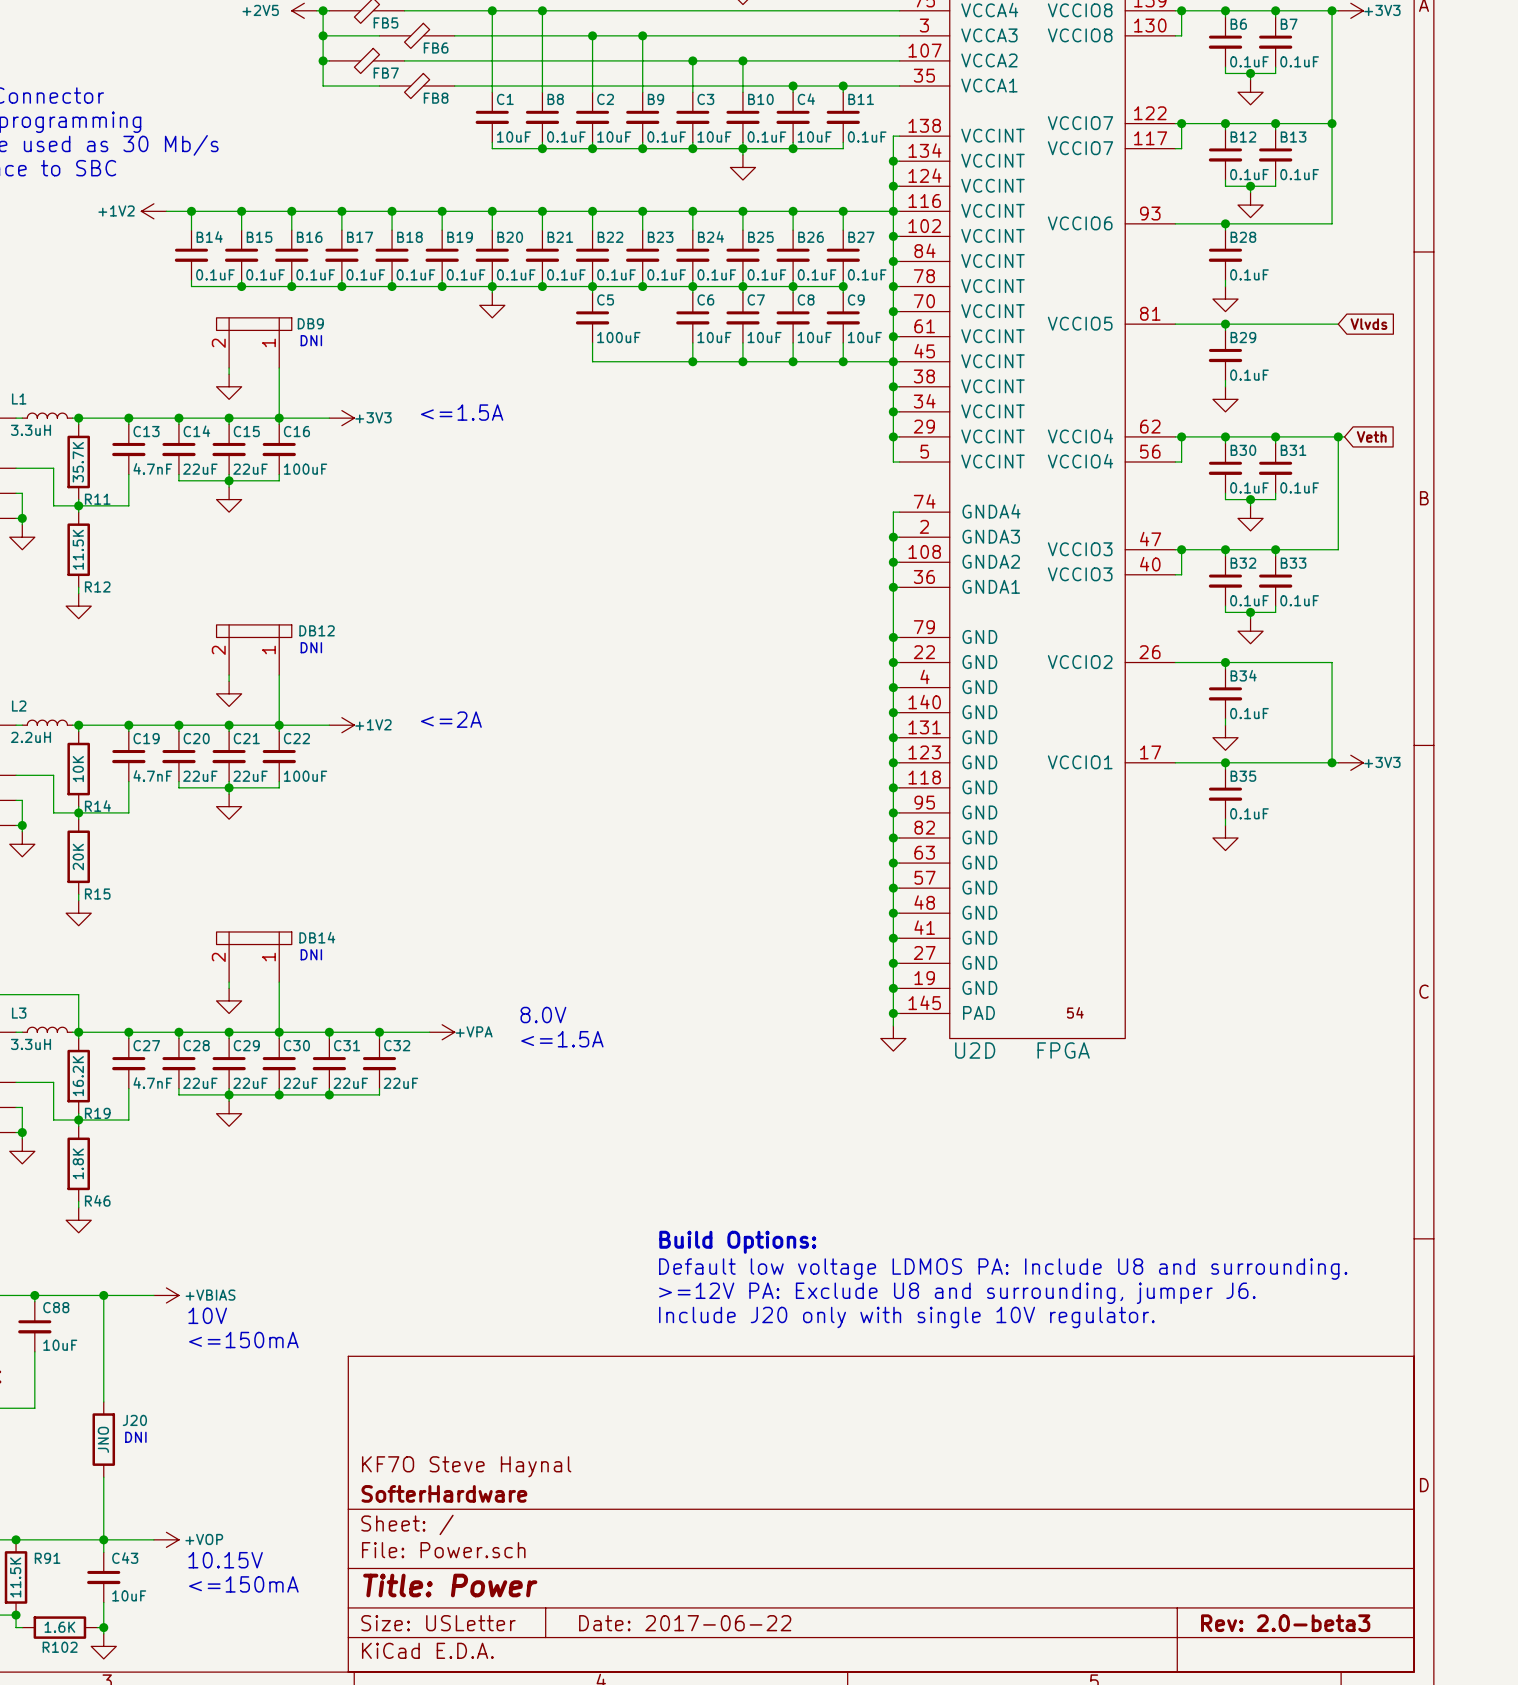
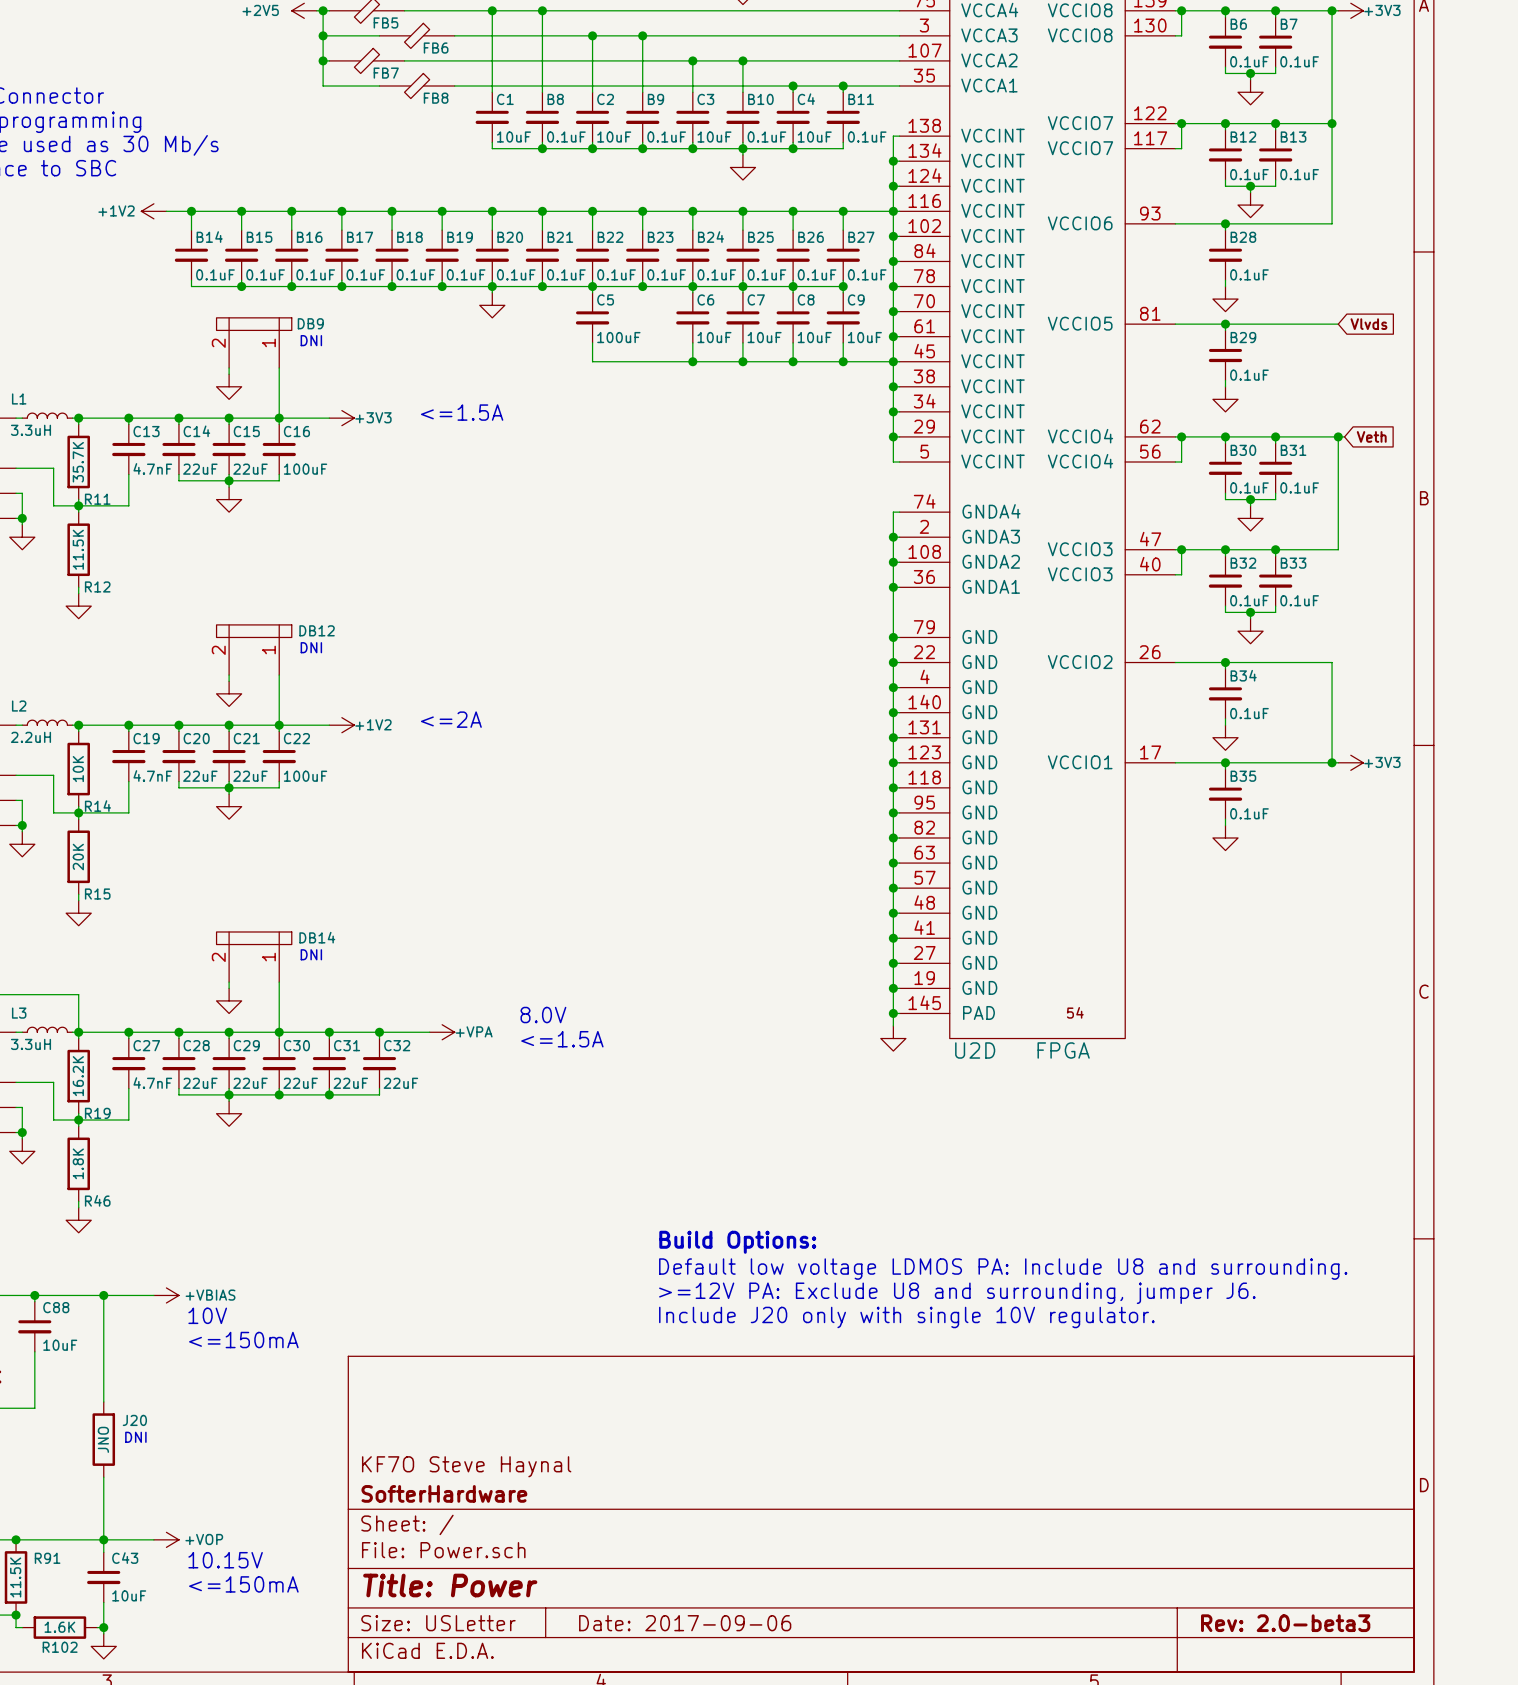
title block: Date: 2017-06-22 (685, 1623) -> Date: 2017-09-06 (685, 1623)

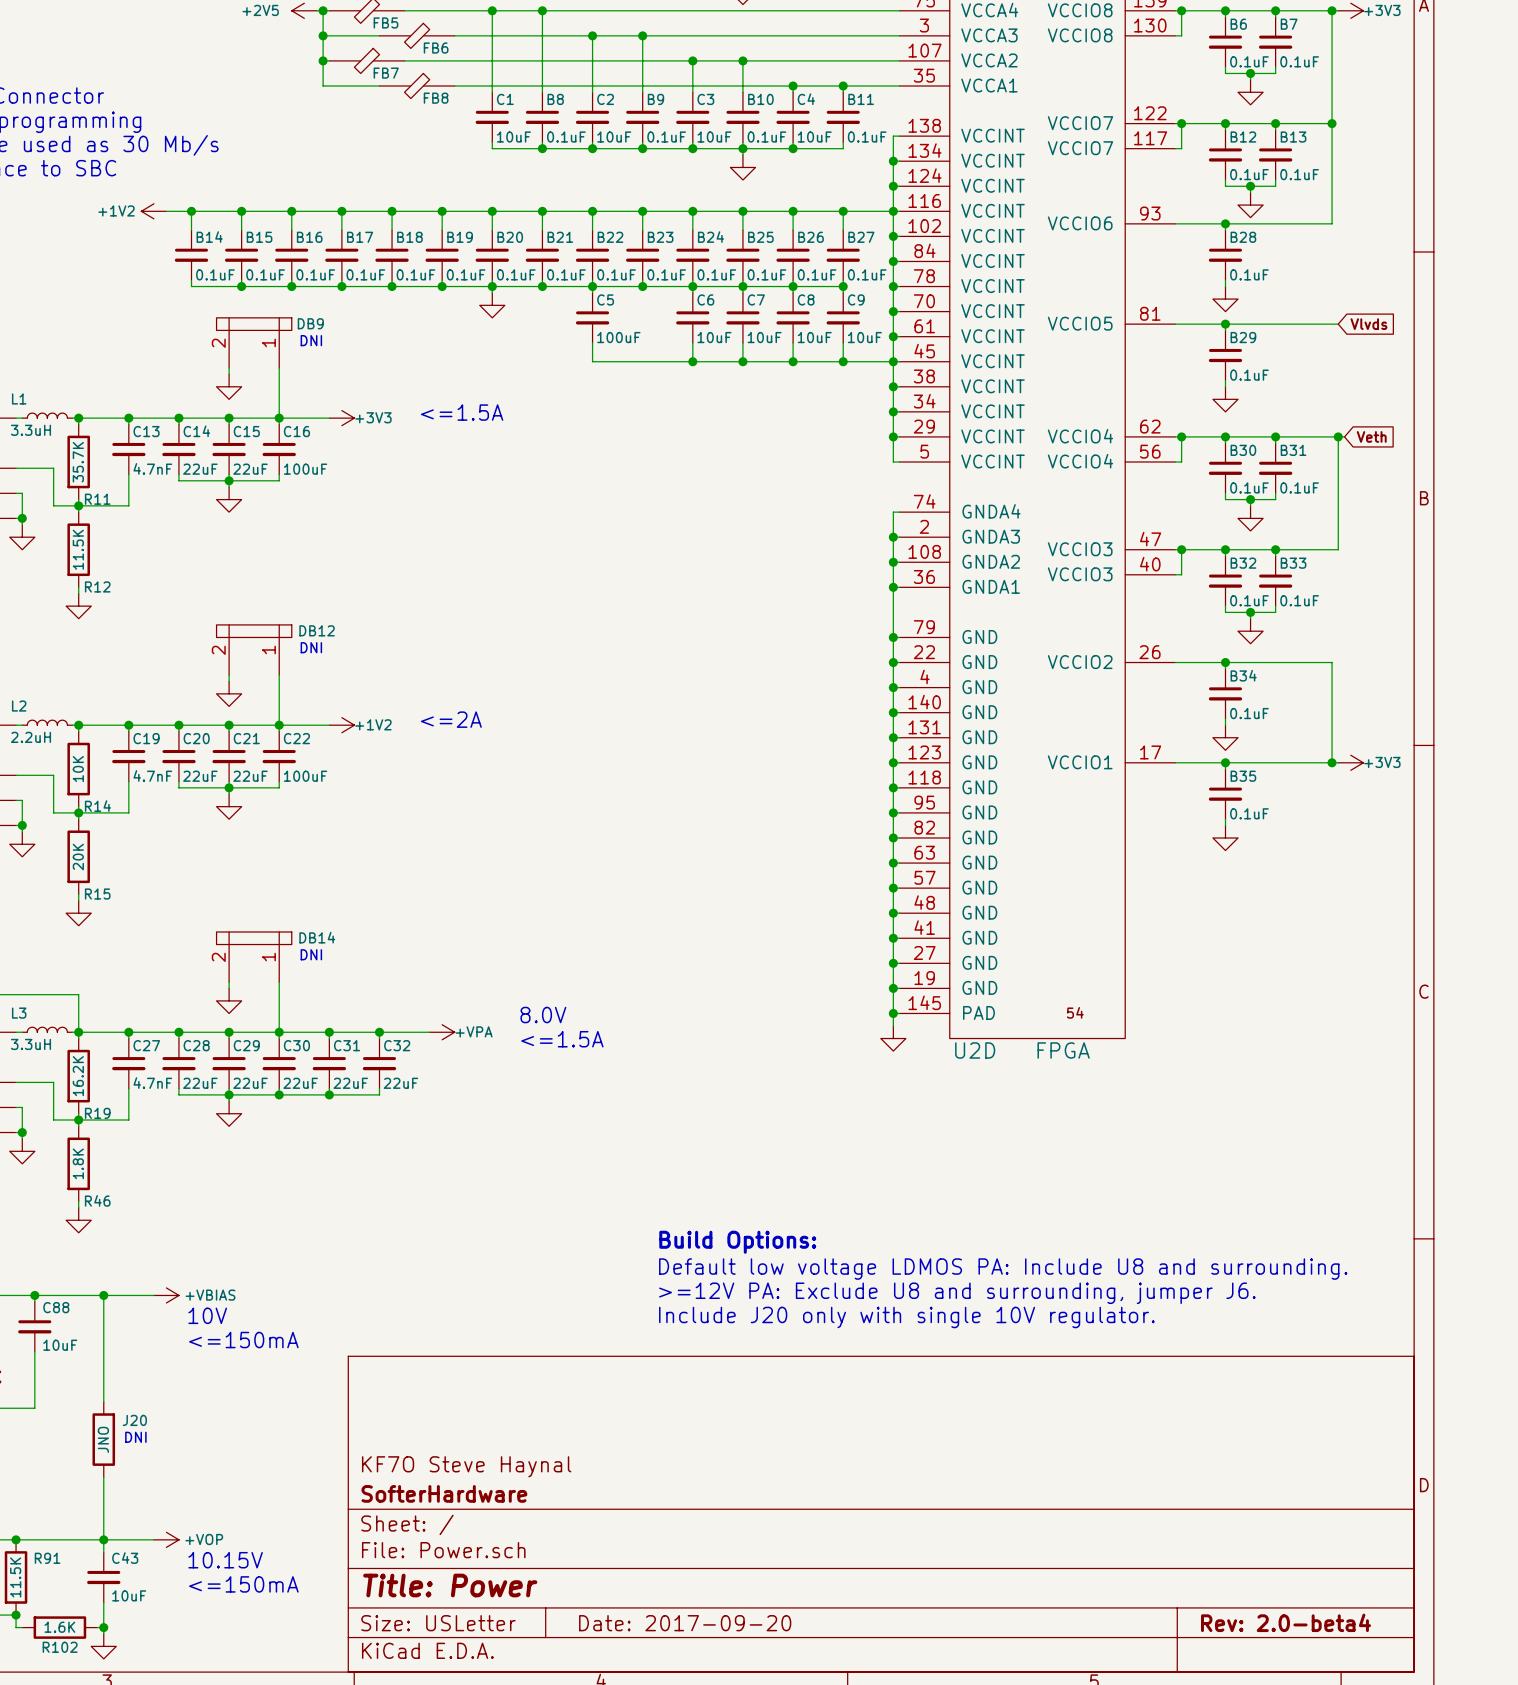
title block: Date: 2017-09-06 (685, 1623) -> Date: 2017-09-20 (685, 1623)
title block: Rev: 2.0-beta3 (1285, 1623) -> Rev: 2.0-beta4 (1286, 1622)

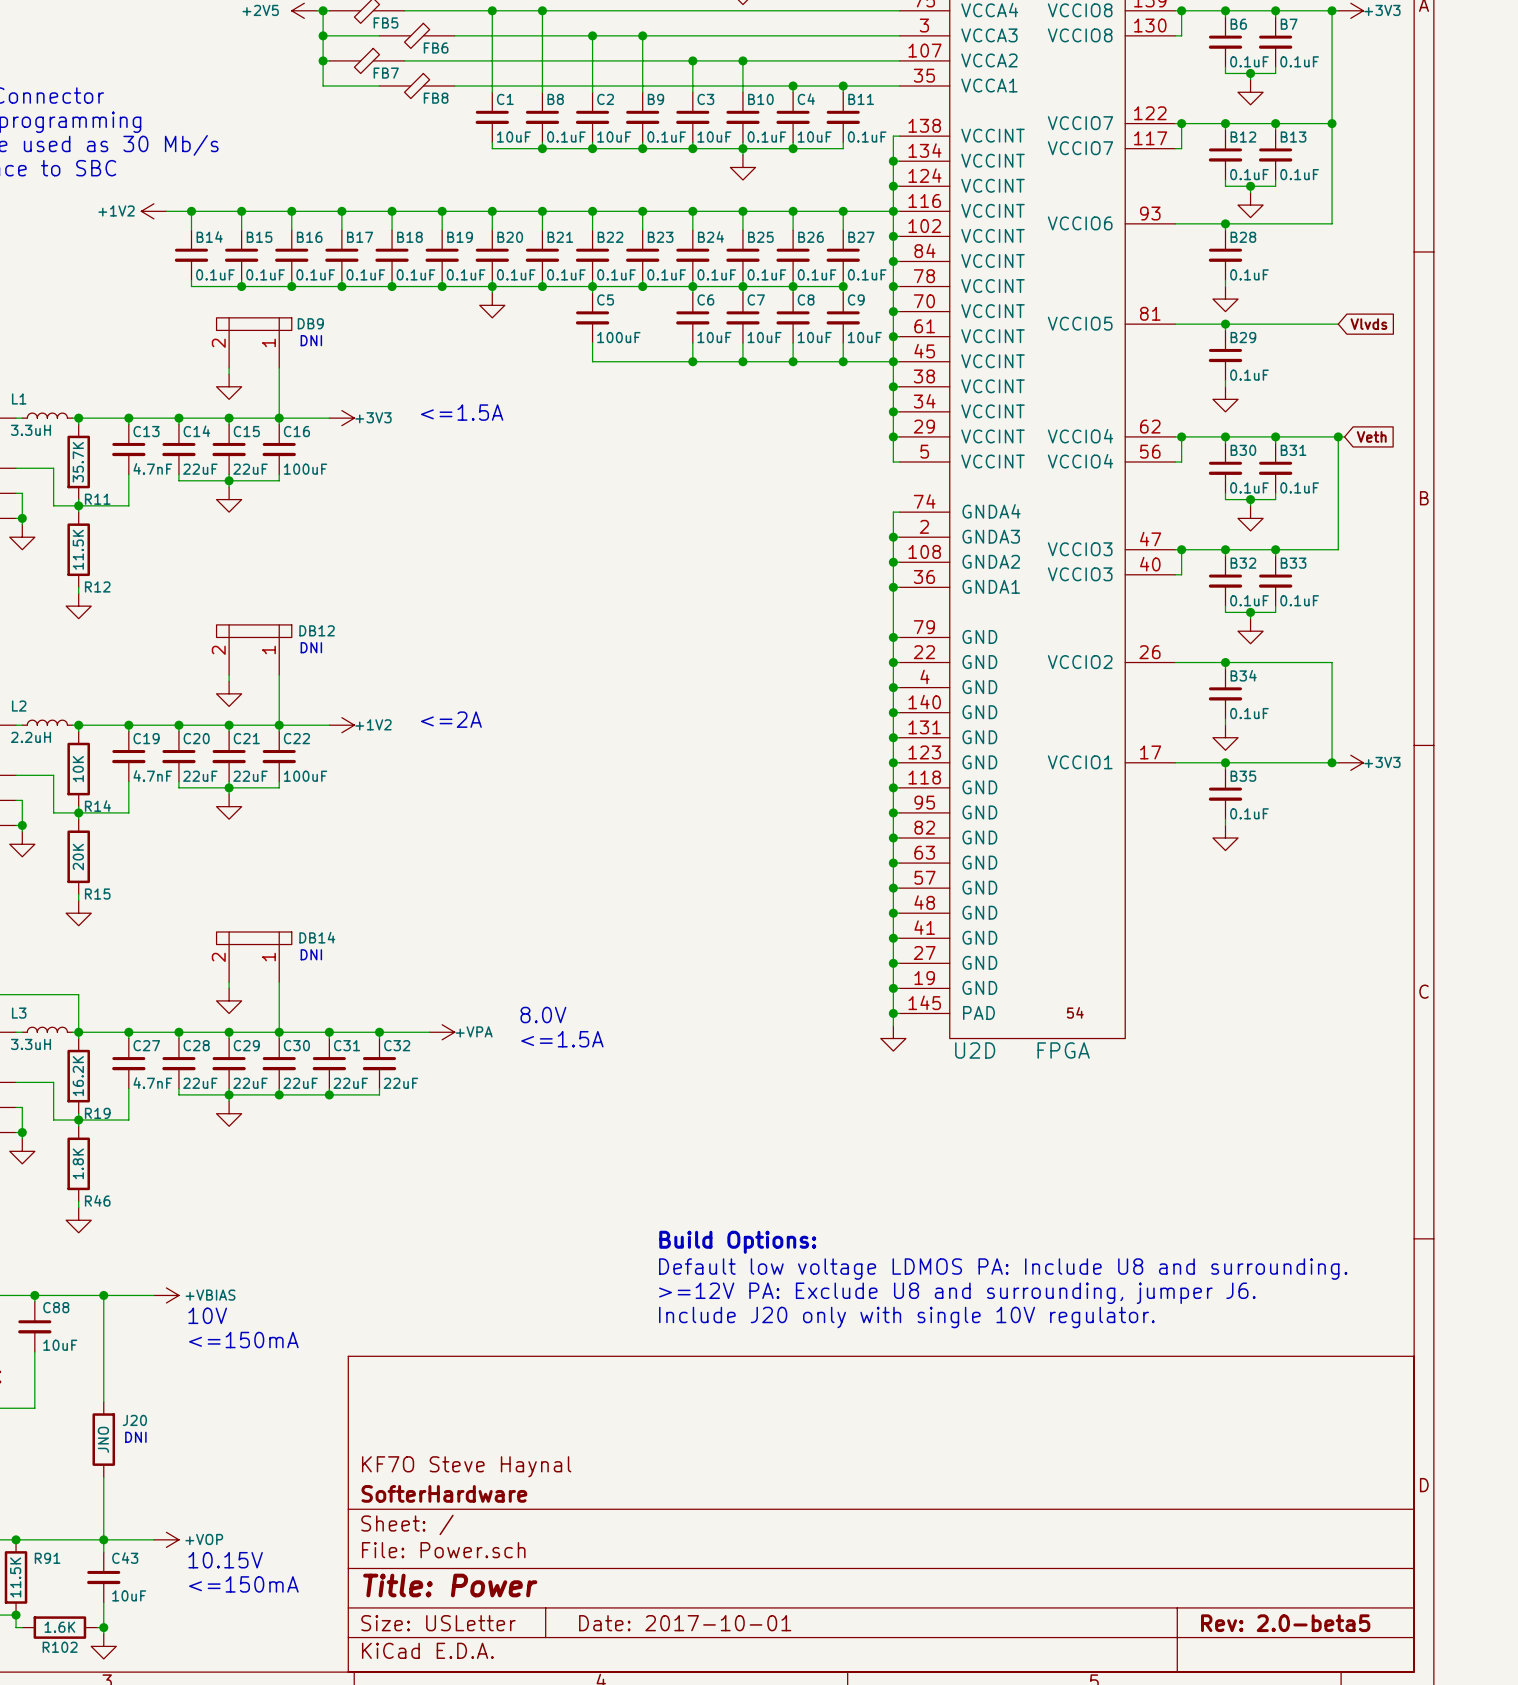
title block: Rev: 2.0-beta4 (1286, 1622) -> Rev: 2.0-beta5 (1285, 1623)
title block: Date: 2017-09-20 (685, 1623) -> Date: 2017-10-01 (685, 1623)

